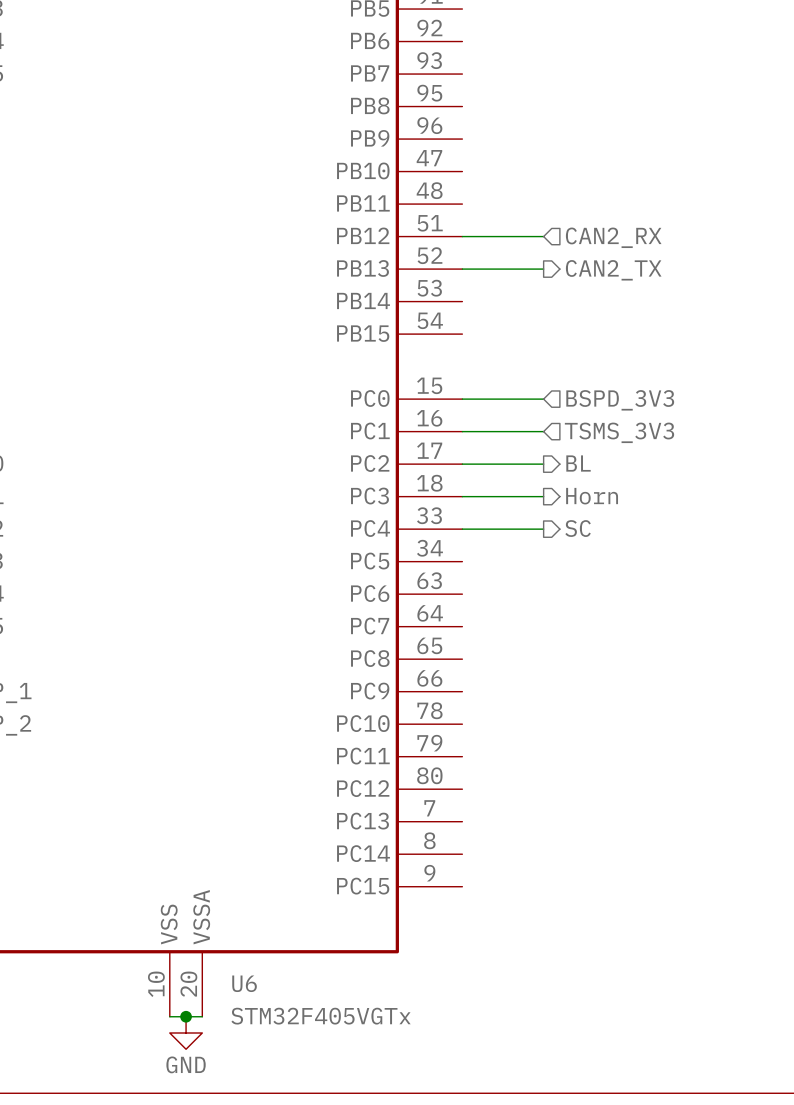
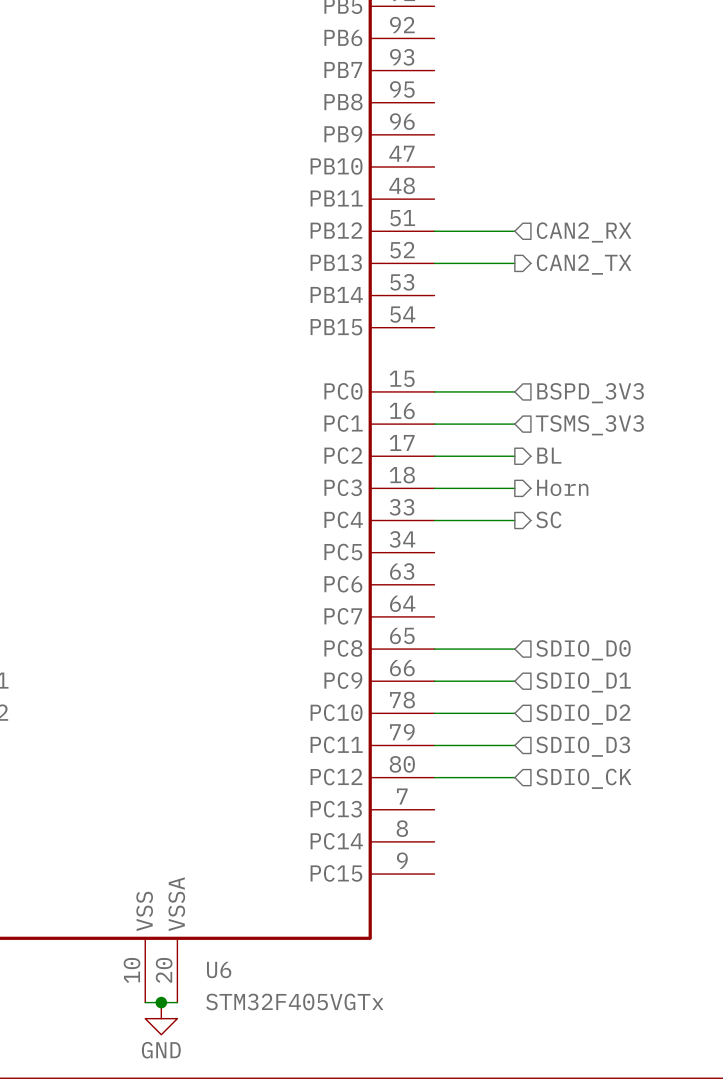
wire: none -> (434, 649) (514, 649)
hierarchical label: none -> SDIO_D0 (583, 650)
wire: none -> (434, 681) (514, 681)
hierarchical label: none -> SDIO_D1 (583, 682)
wire: none -> (434, 713) (514, 713)
hierarchical label: none -> SDIO_D2 (583, 714)
wire: none -> (434, 745) (514, 745)
hierarchical label: none -> SDIO_D3 (583, 746)
wire: none -> (434, 777) (514, 777)
hierarchical label: none -> SDIO_CK (583, 778)

